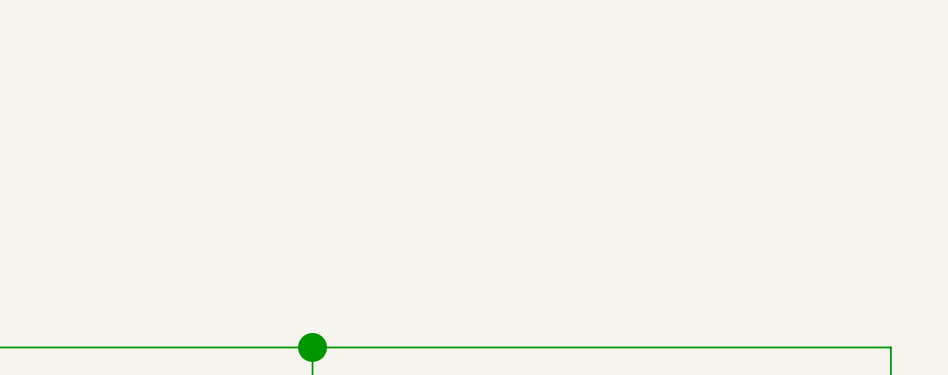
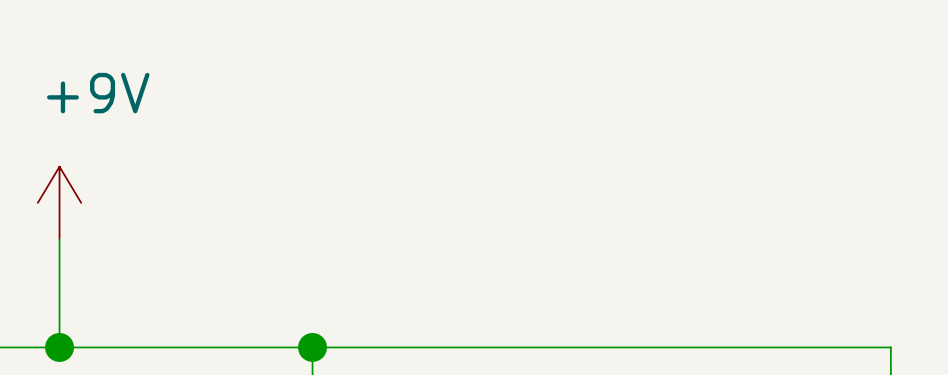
power symbol: none -> +9V (59, 202)
wire: none -> (59, 239) (59, 347)
junction: none -> (59, 347)

